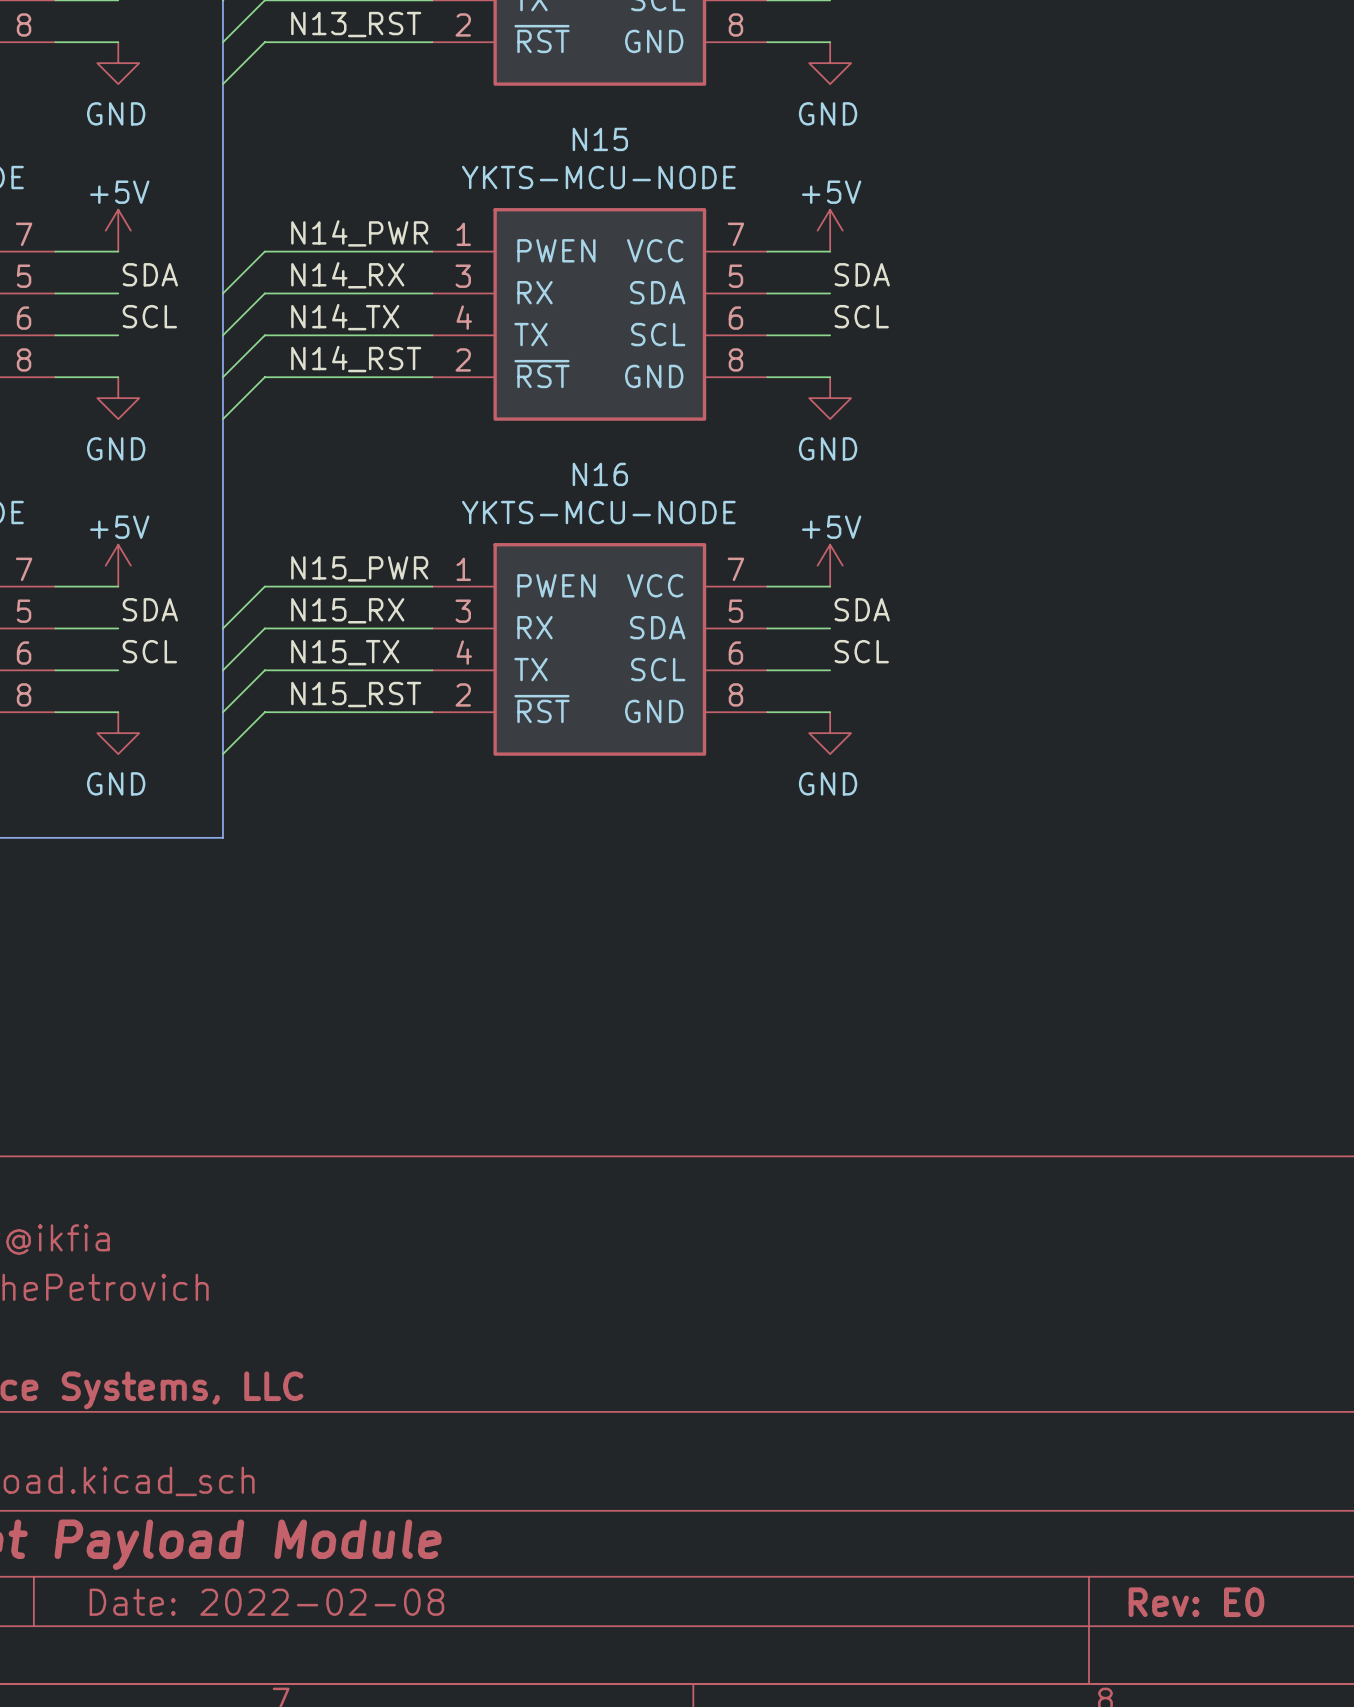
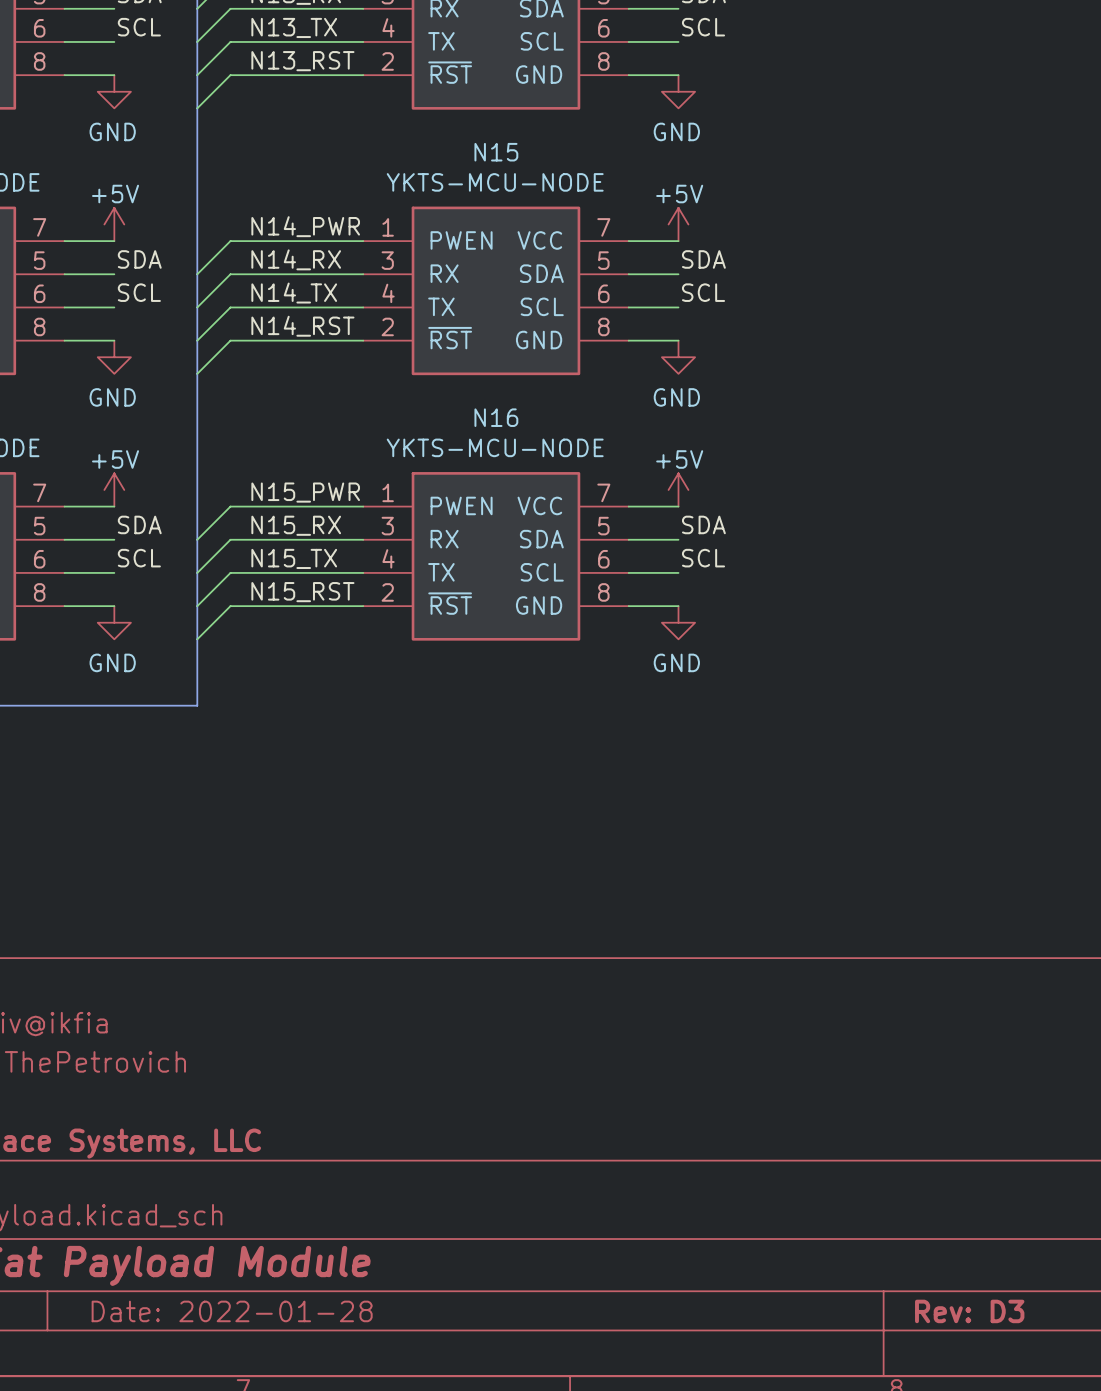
title block: Date: 2022-02-08 (266, 1602) -> Date: 2022-01-28 (232, 1311)
title block: Rev: E0 (1196, 1602) -> Rev: D3 (969, 1311)

